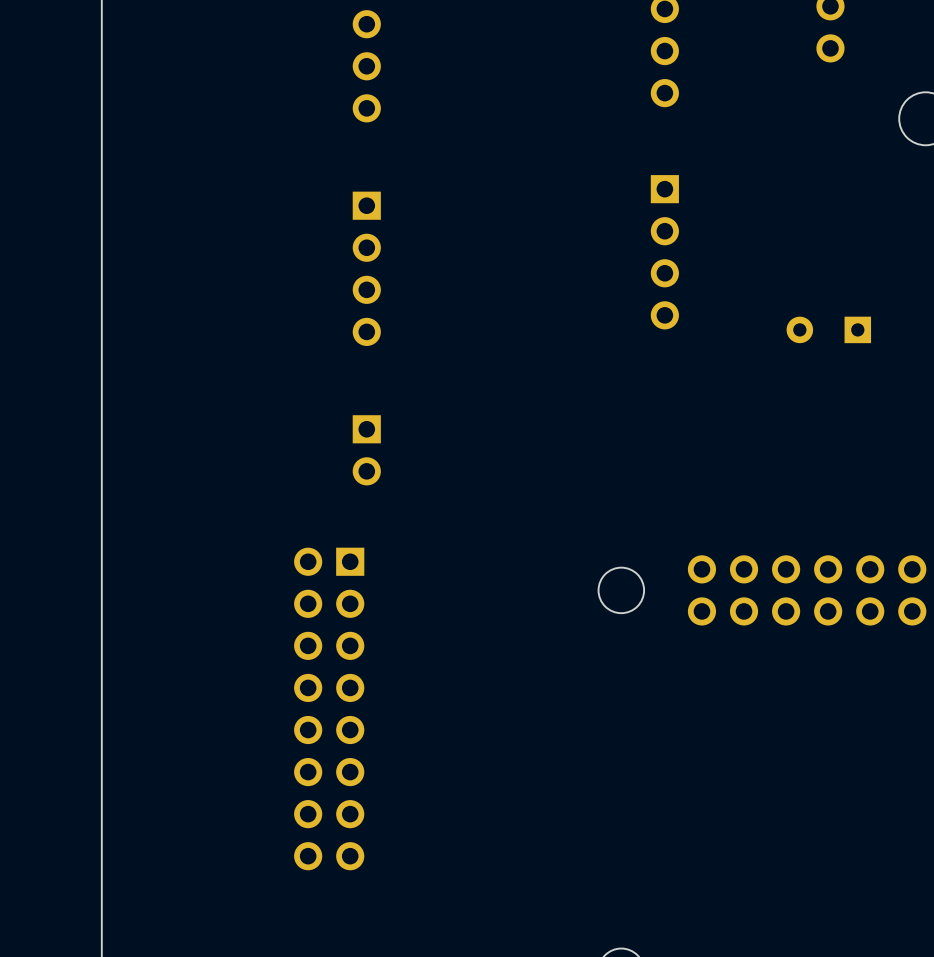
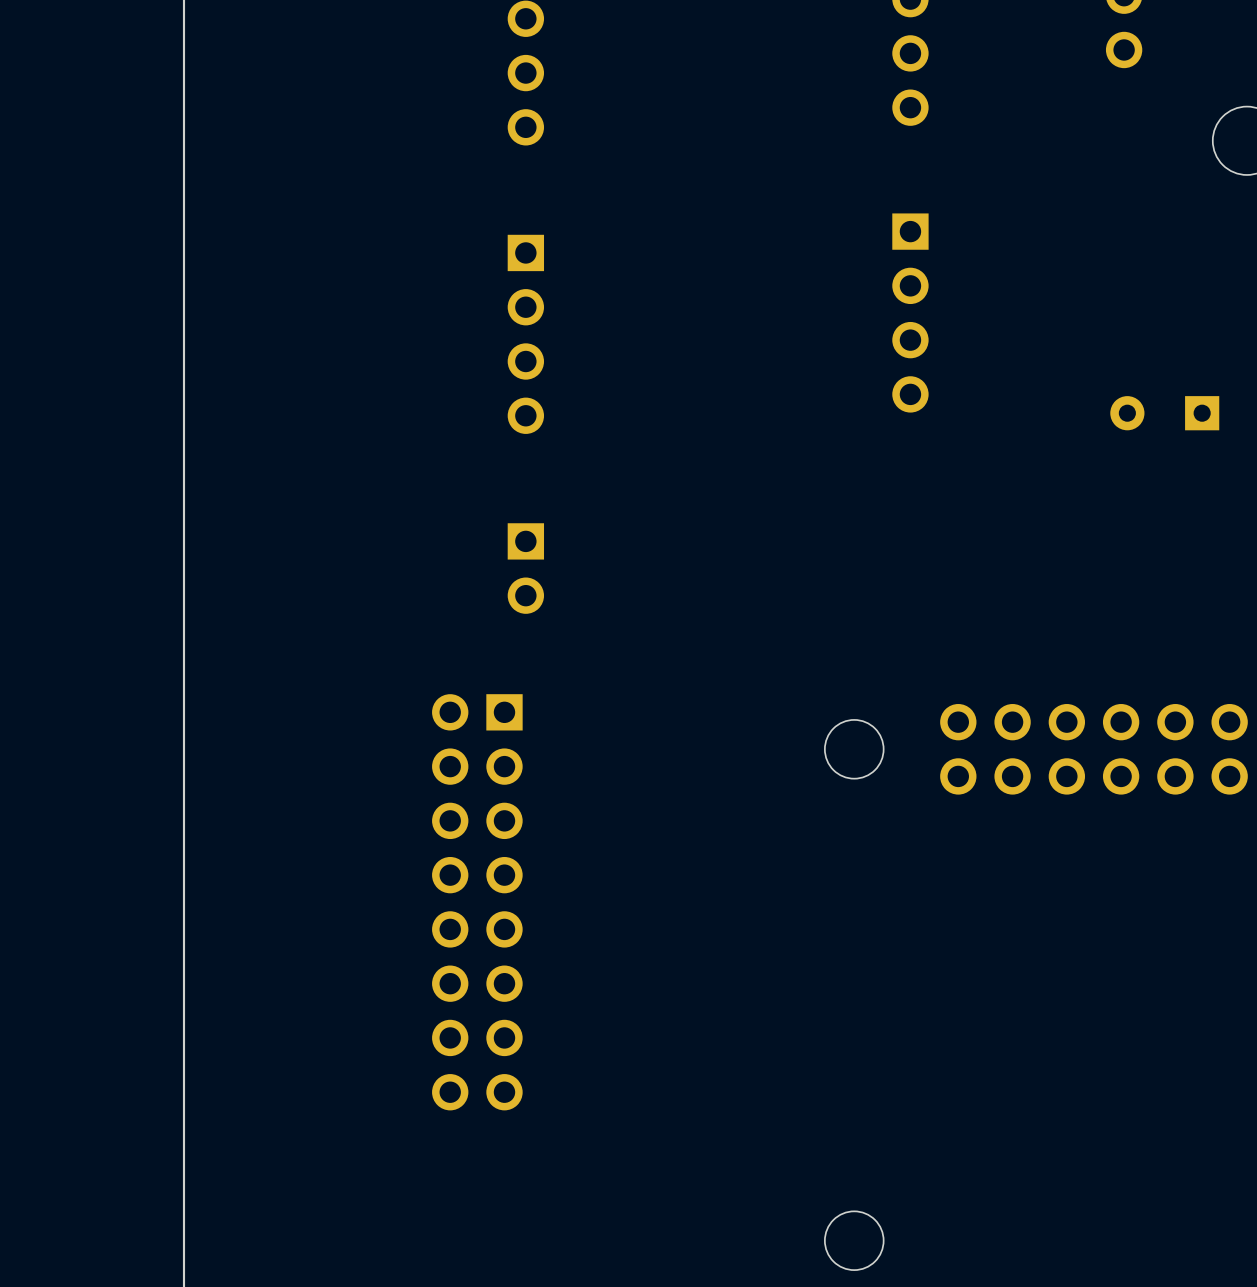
part position: (828, 329) -> (1164, 413)

